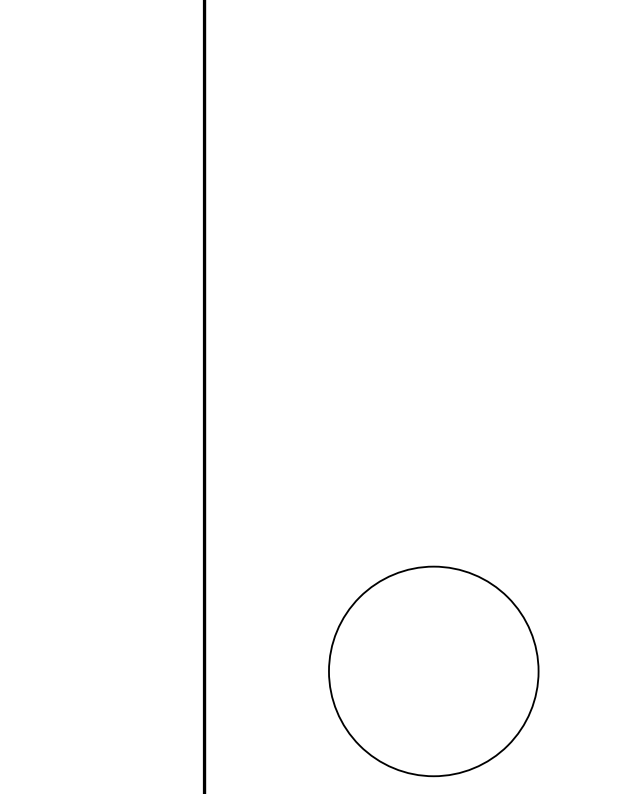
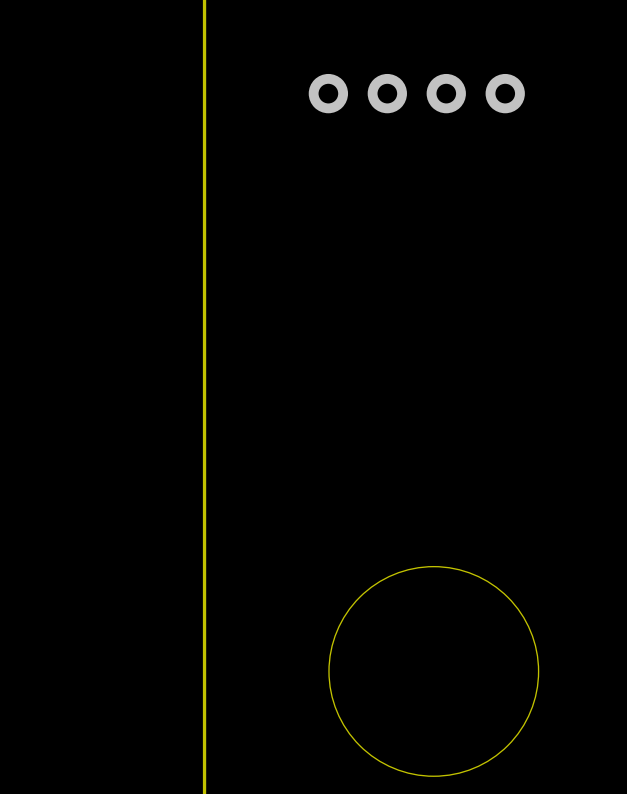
via: none -> (328, 93)
via: none -> (387, 93)
via: none -> (446, 93)
via: none -> (505, 93)

